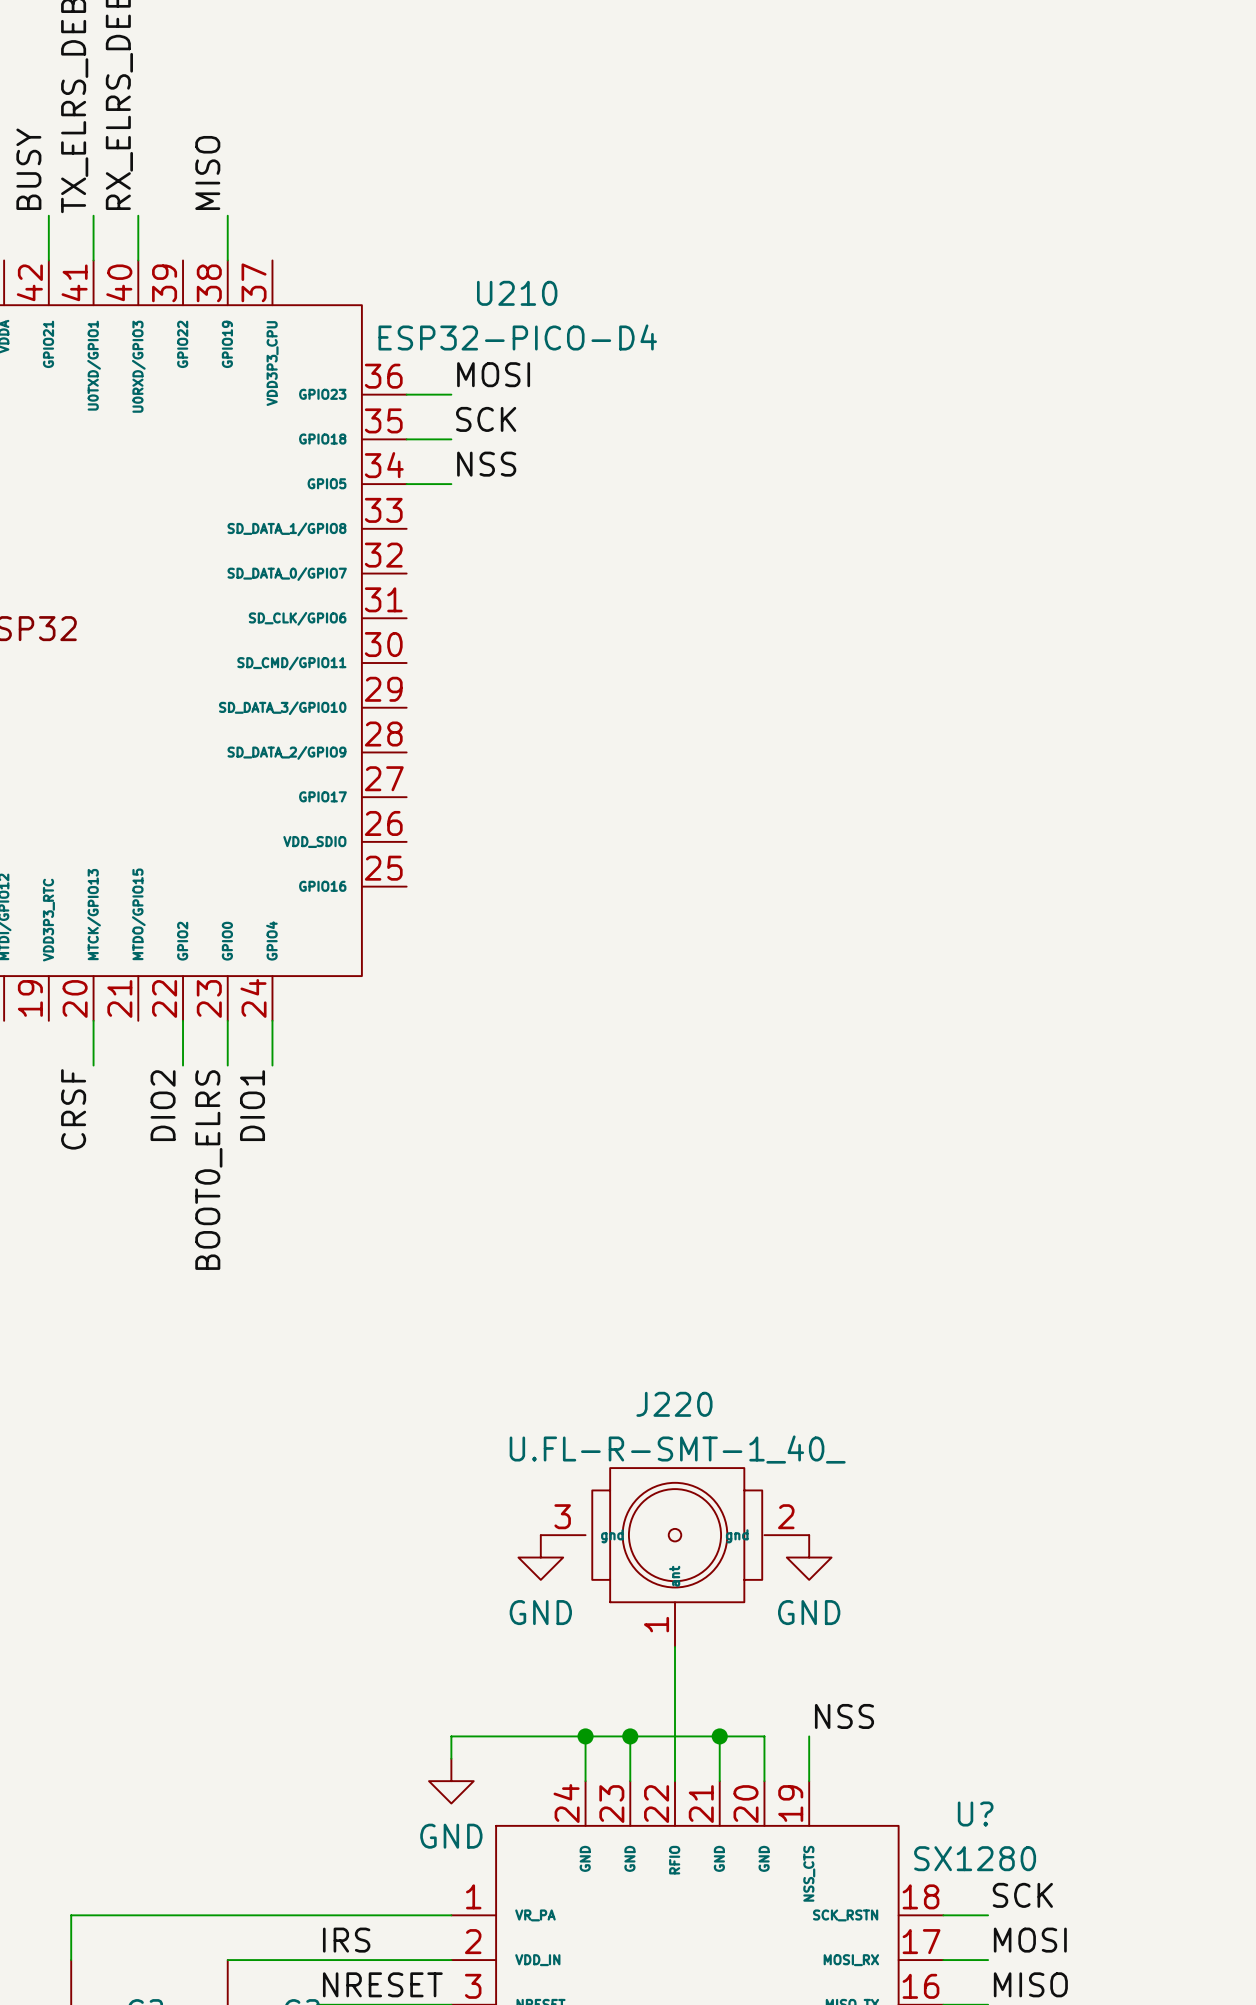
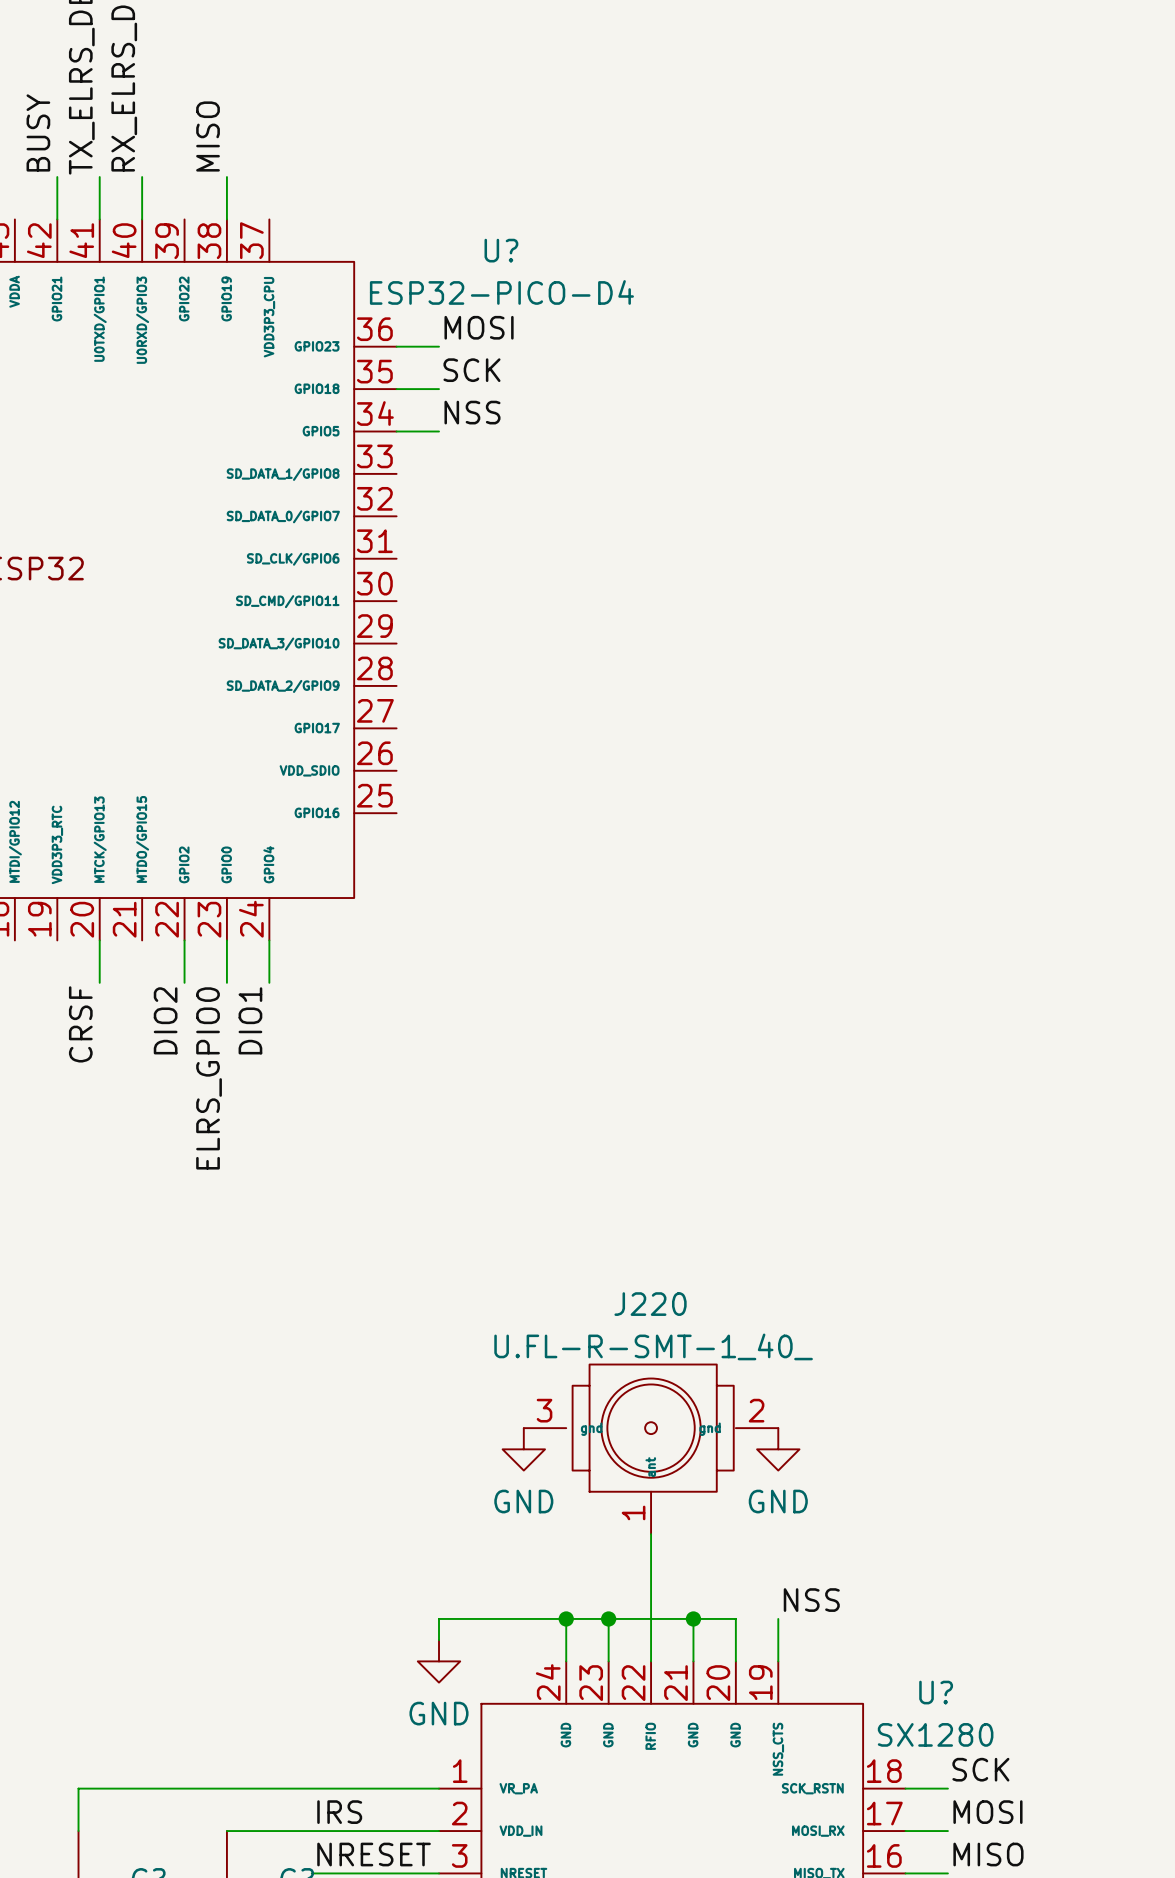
U210 name: U210 (517, 293) -> U? (501, 250)
label: BOOT0_ELRS (208, 1170) -> ELRS_GPIO0 (209, 1078)

